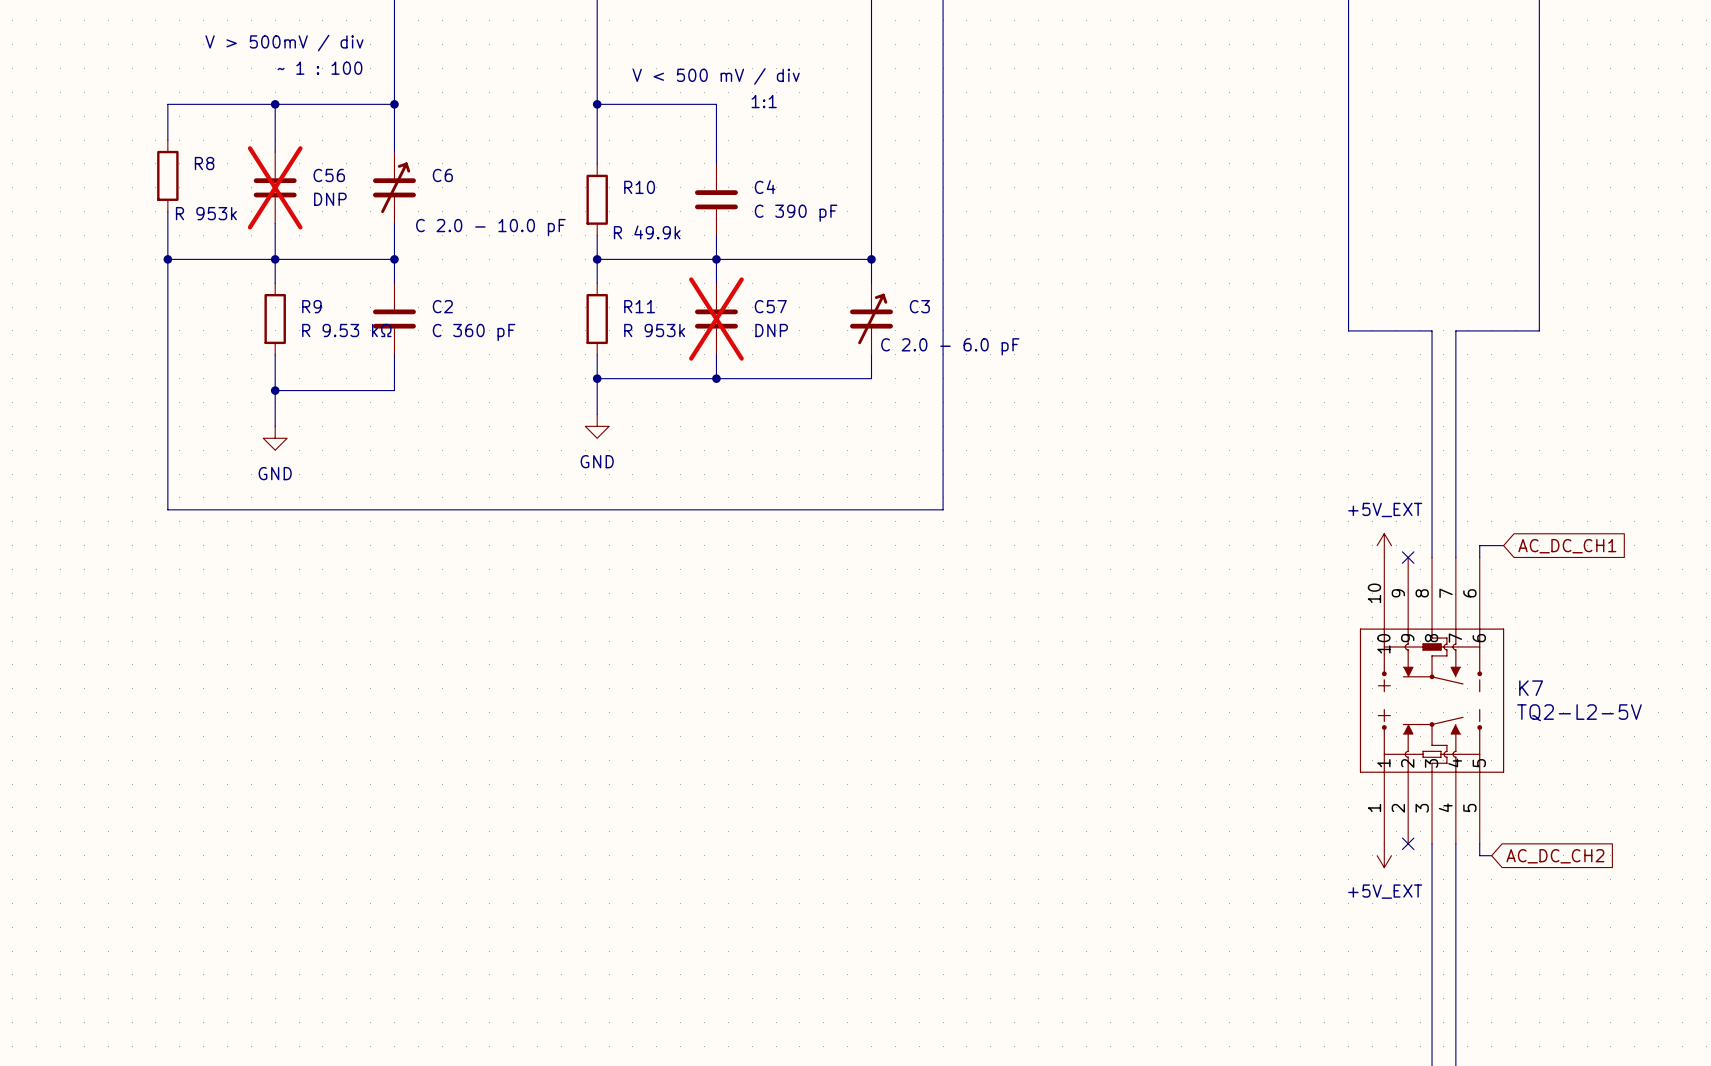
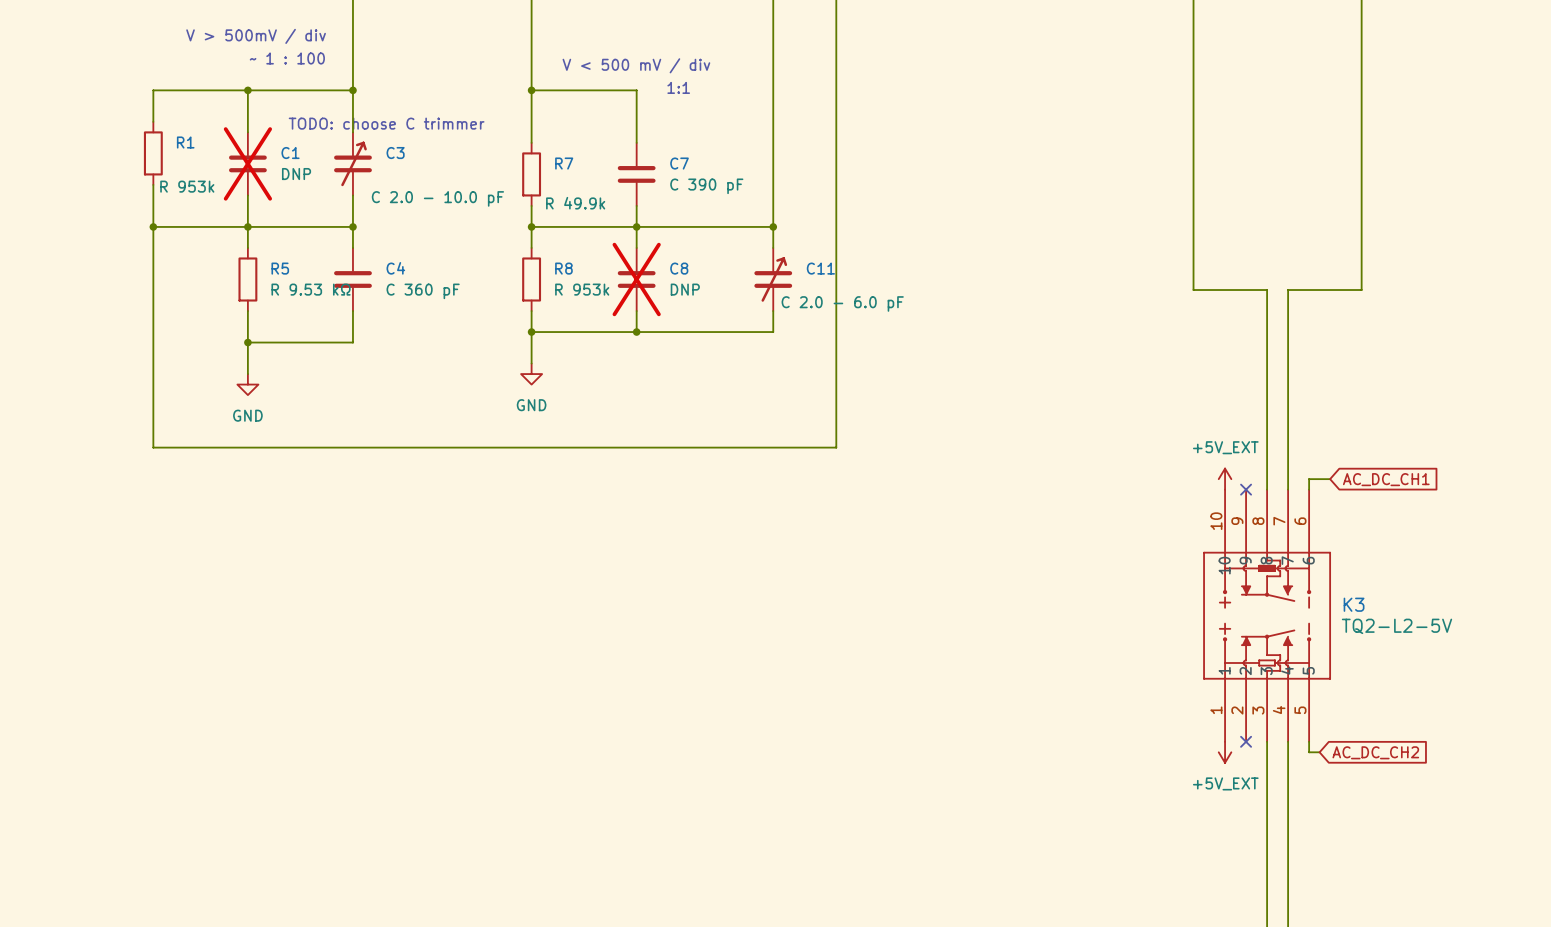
text: none -> TODO: choose C trimmer (386, 123)
R8 name: R8 (204, 163) -> R1 (185, 142)
C56 name: C56 (329, 175) -> C1 (290, 153)
C6 name: C6 (442, 175) -> C3 (395, 153)
R10 name: R10 (639, 187) -> R7 (564, 163)
C4 name: C4 (765, 187) -> C7 (679, 163)
R9 name: R9 (311, 306) -> R5 (280, 268)
C2 name: C2 (442, 306) -> C4 (395, 268)
R11 name: R11 (639, 306) -> R8 (563, 268)
C57 name: C57 (770, 306) -> C8 (679, 268)
C3 name: C3 (919, 306) -> C11 (820, 268)
K7 name: K7 (1531, 688) -> K3 (1354, 604)

